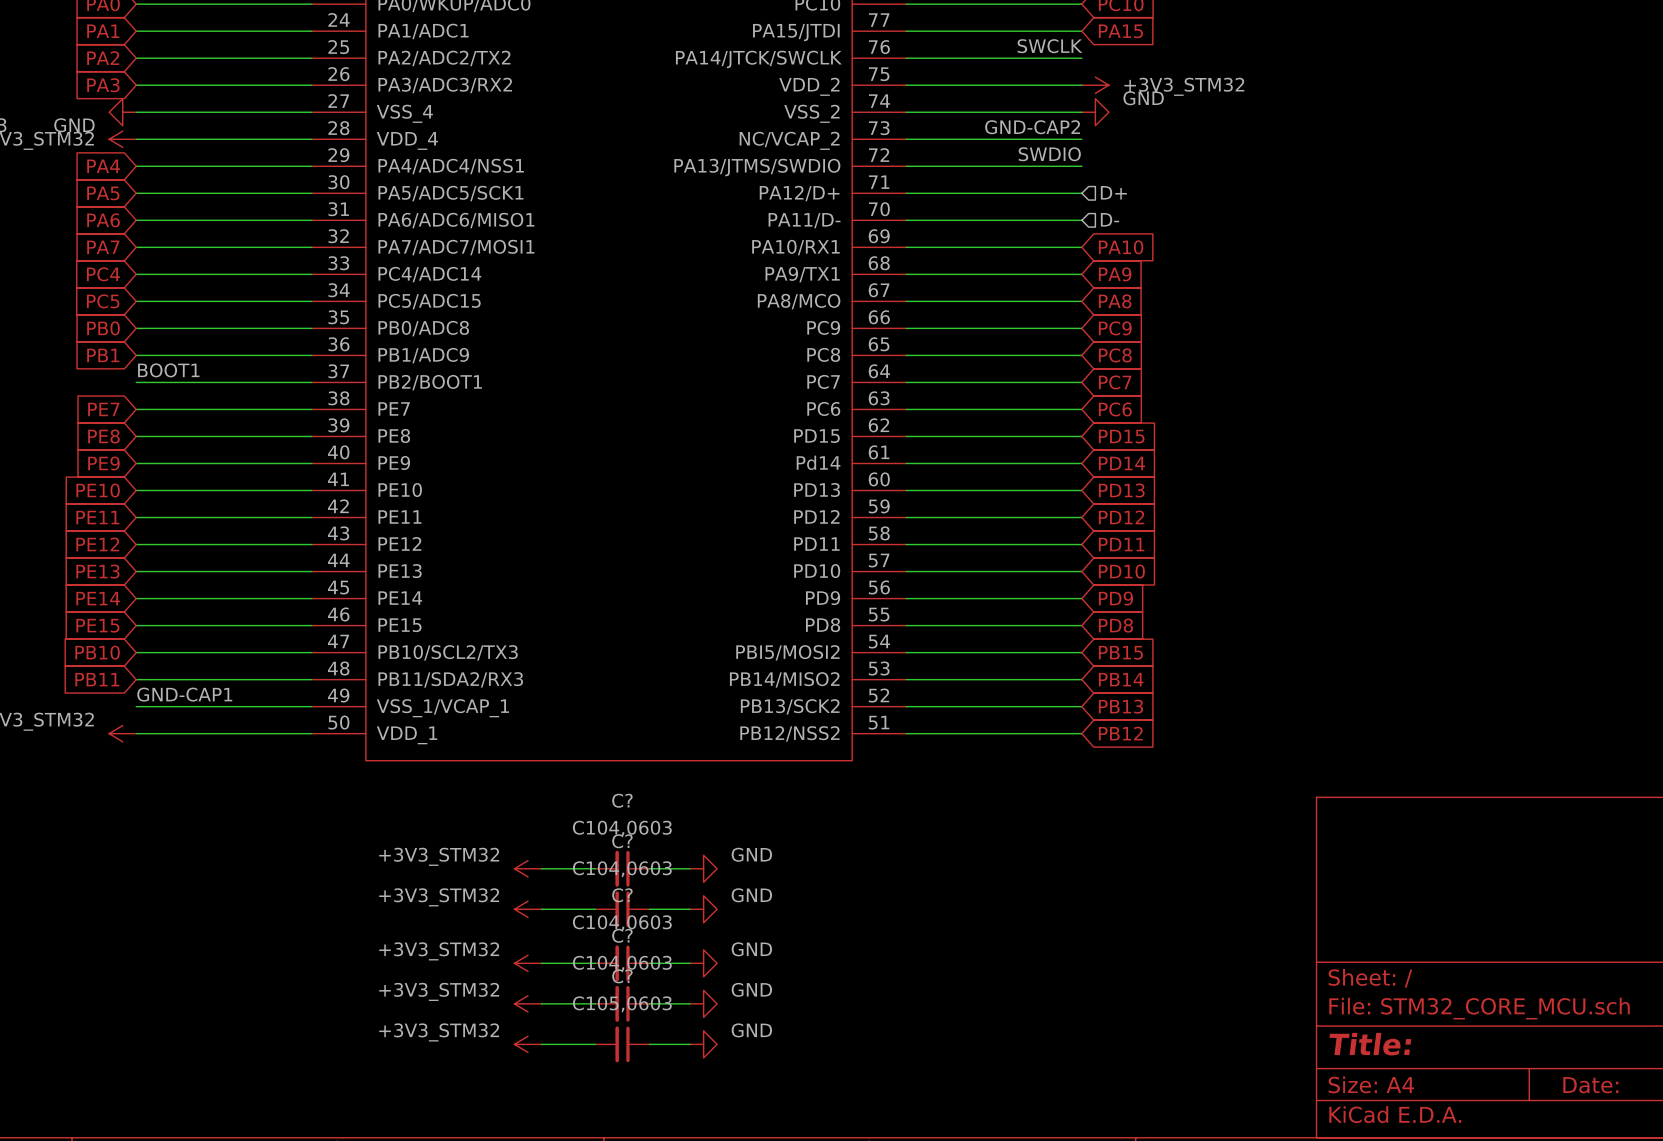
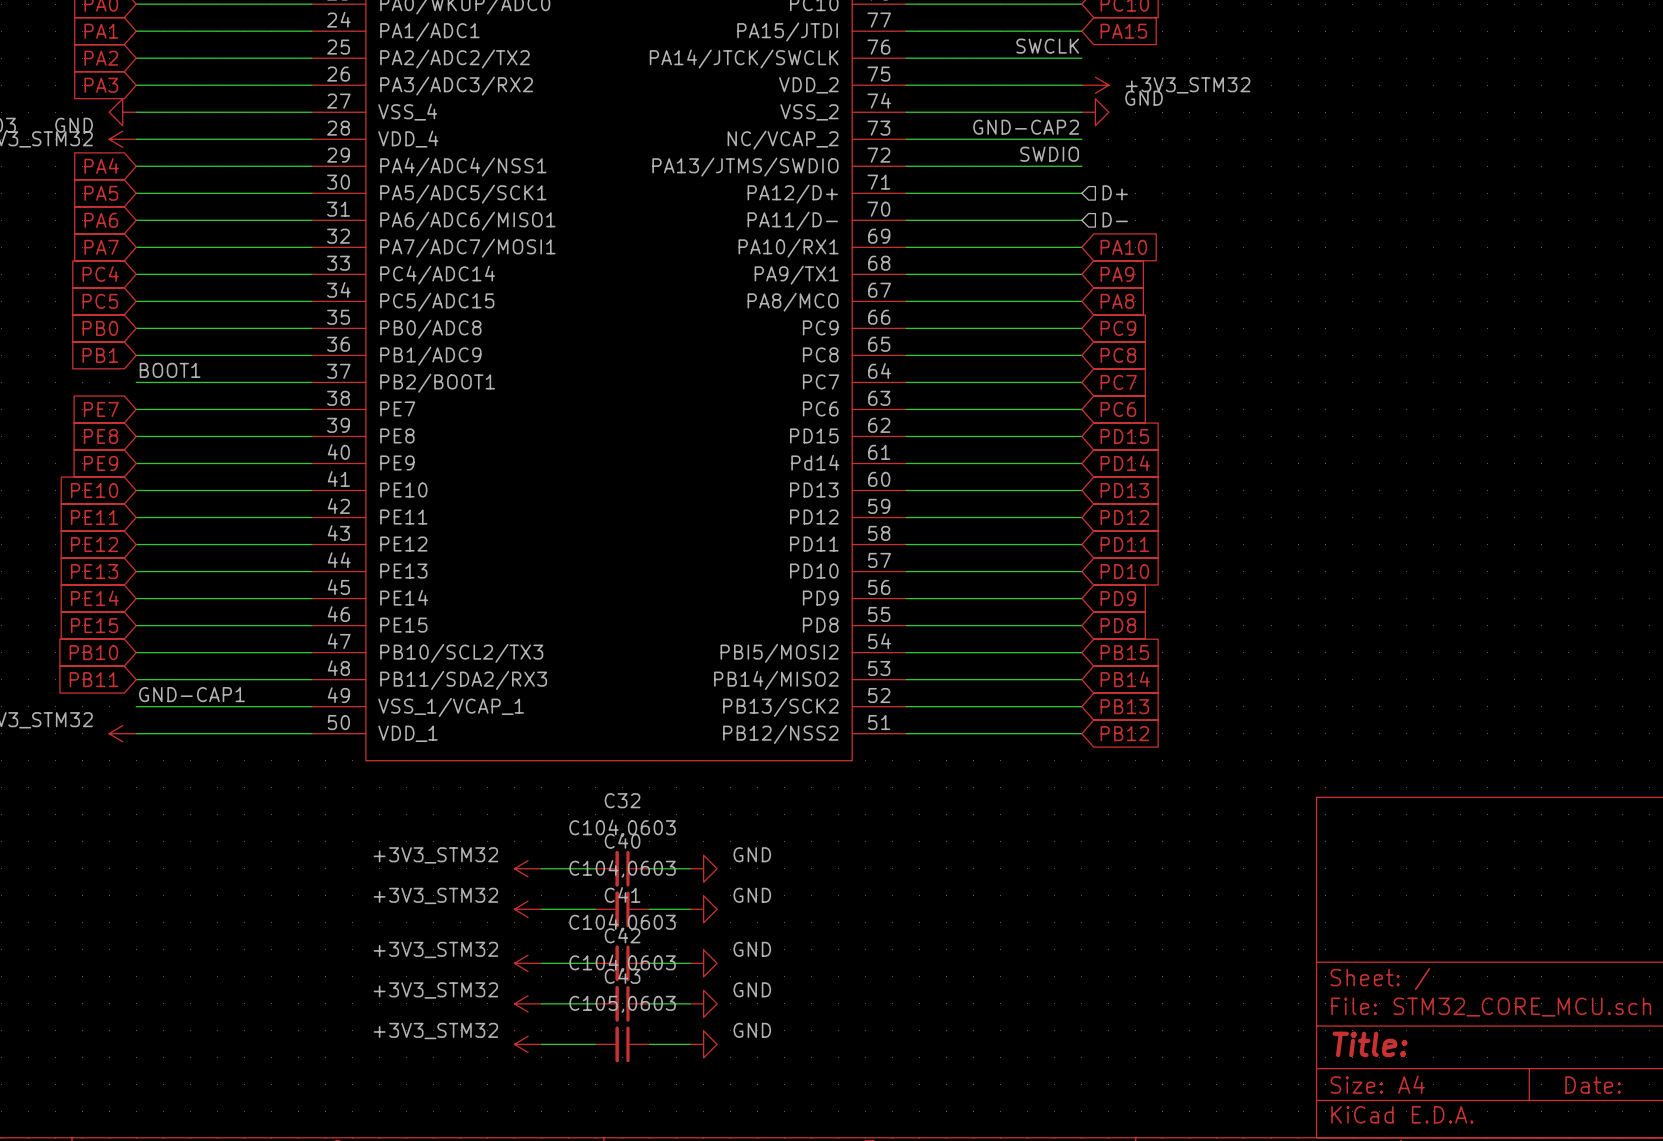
C? name: C? (622, 800) -> C32 (622, 800)
C? name: C? (622, 841) -> C40 (622, 840)
C? name: C? (622, 895) -> C41 (622, 894)
C? name: C? (622, 935) -> C42 (622, 935)
C? name: C? (622, 976) -> C43 (622, 976)

